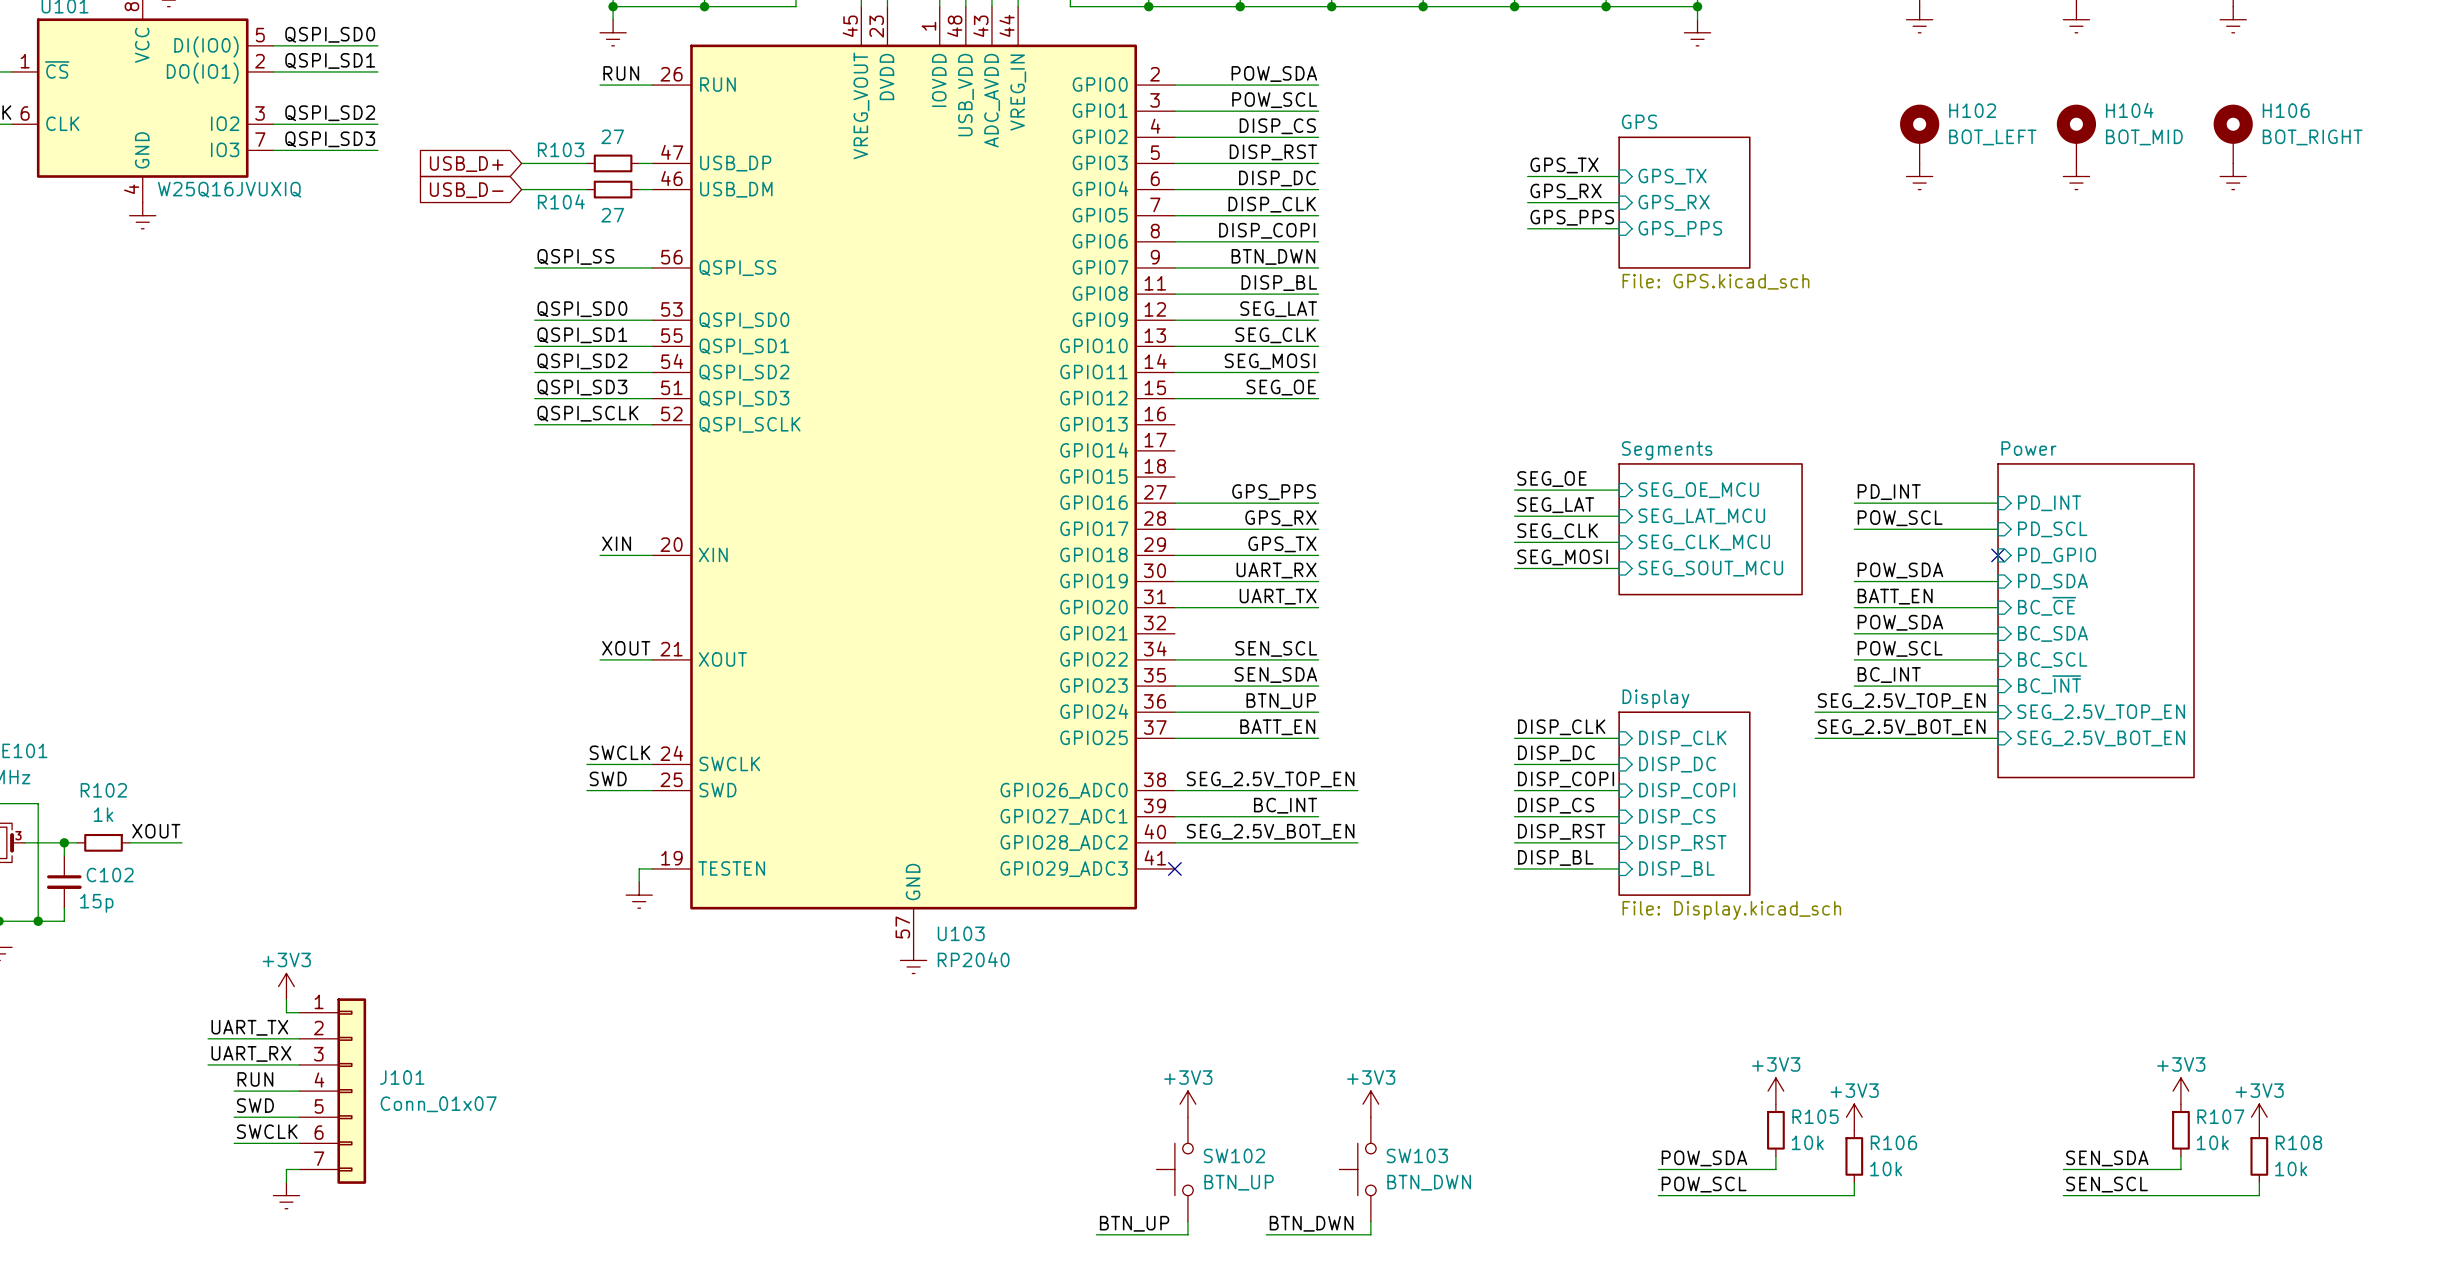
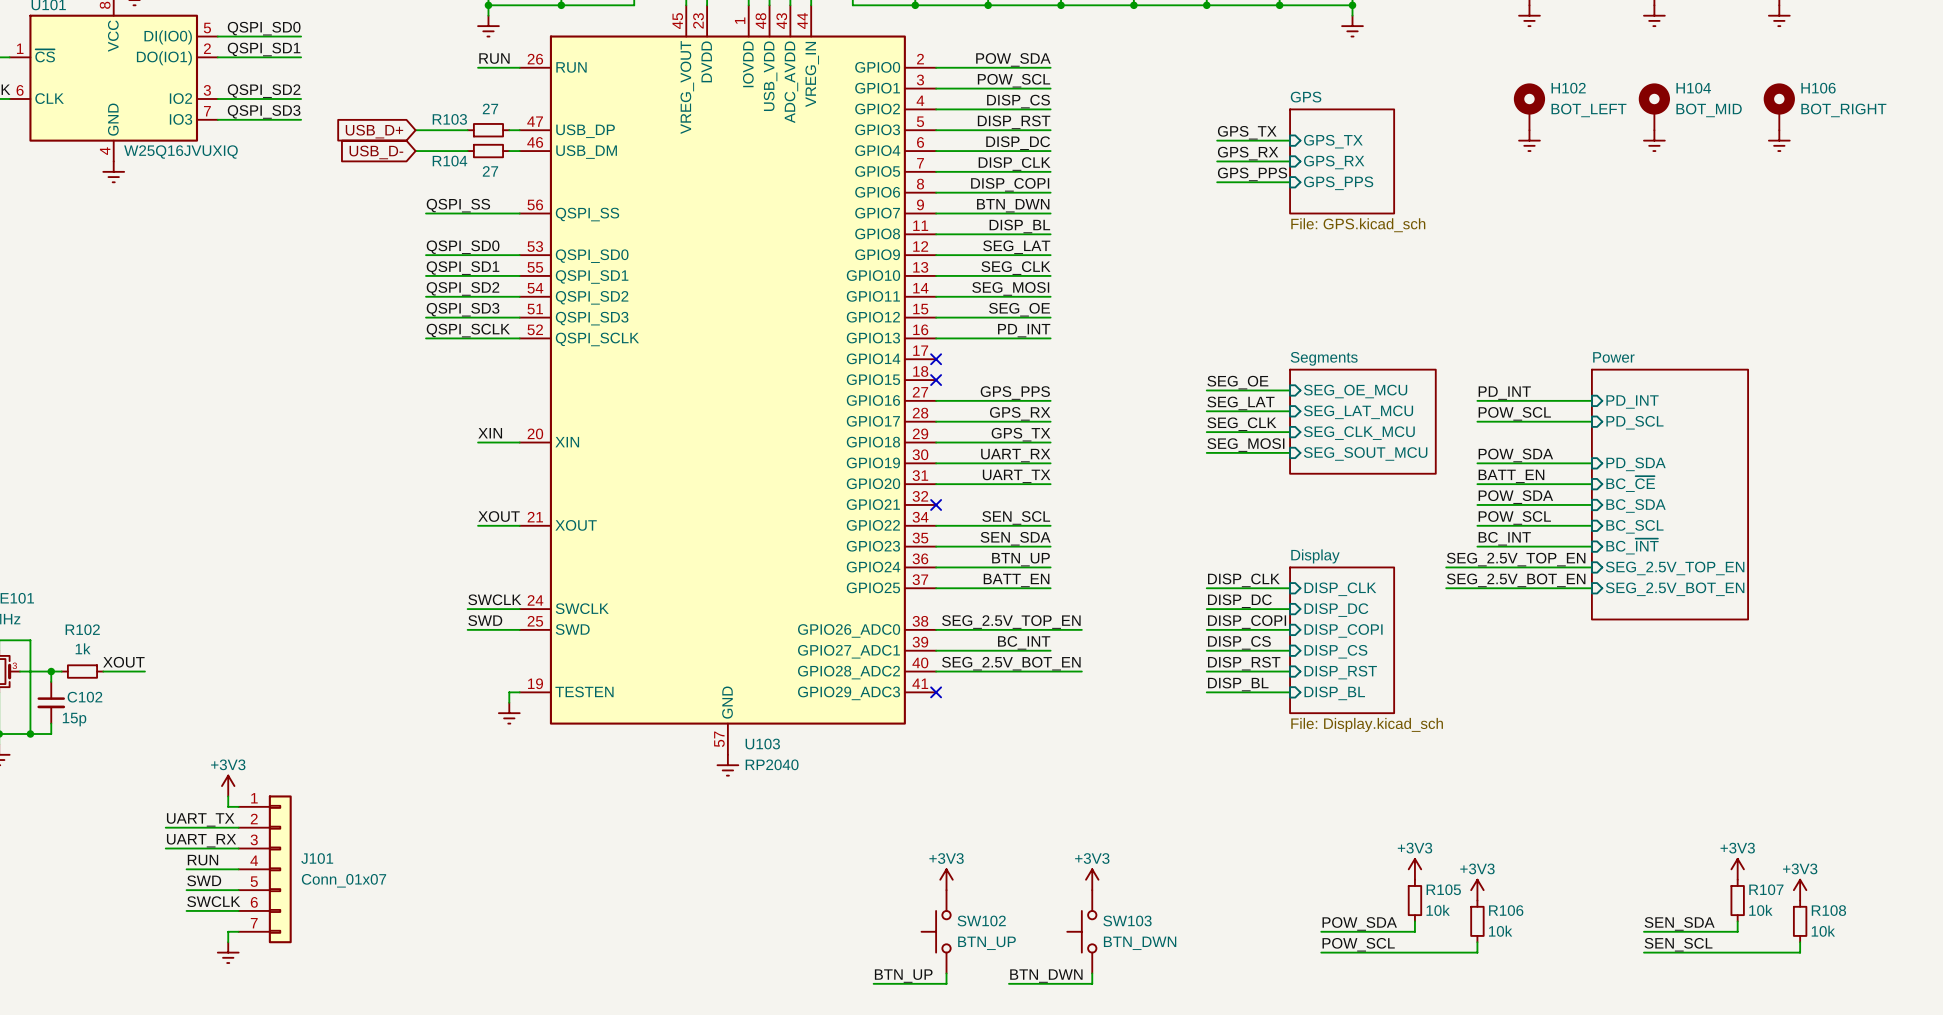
label: none -> PD_INT (1024, 330)
wire: none -> (936, 338) (1050, 338)
no-connect mark: none -> (936, 359)
no-connect mark: none -> (936, 380)
no-connect mark: (1998, 555) -> none
sheet pin: PD_GPIO (2057, 555) -> none
no-connect mark: none -> (936, 504)

